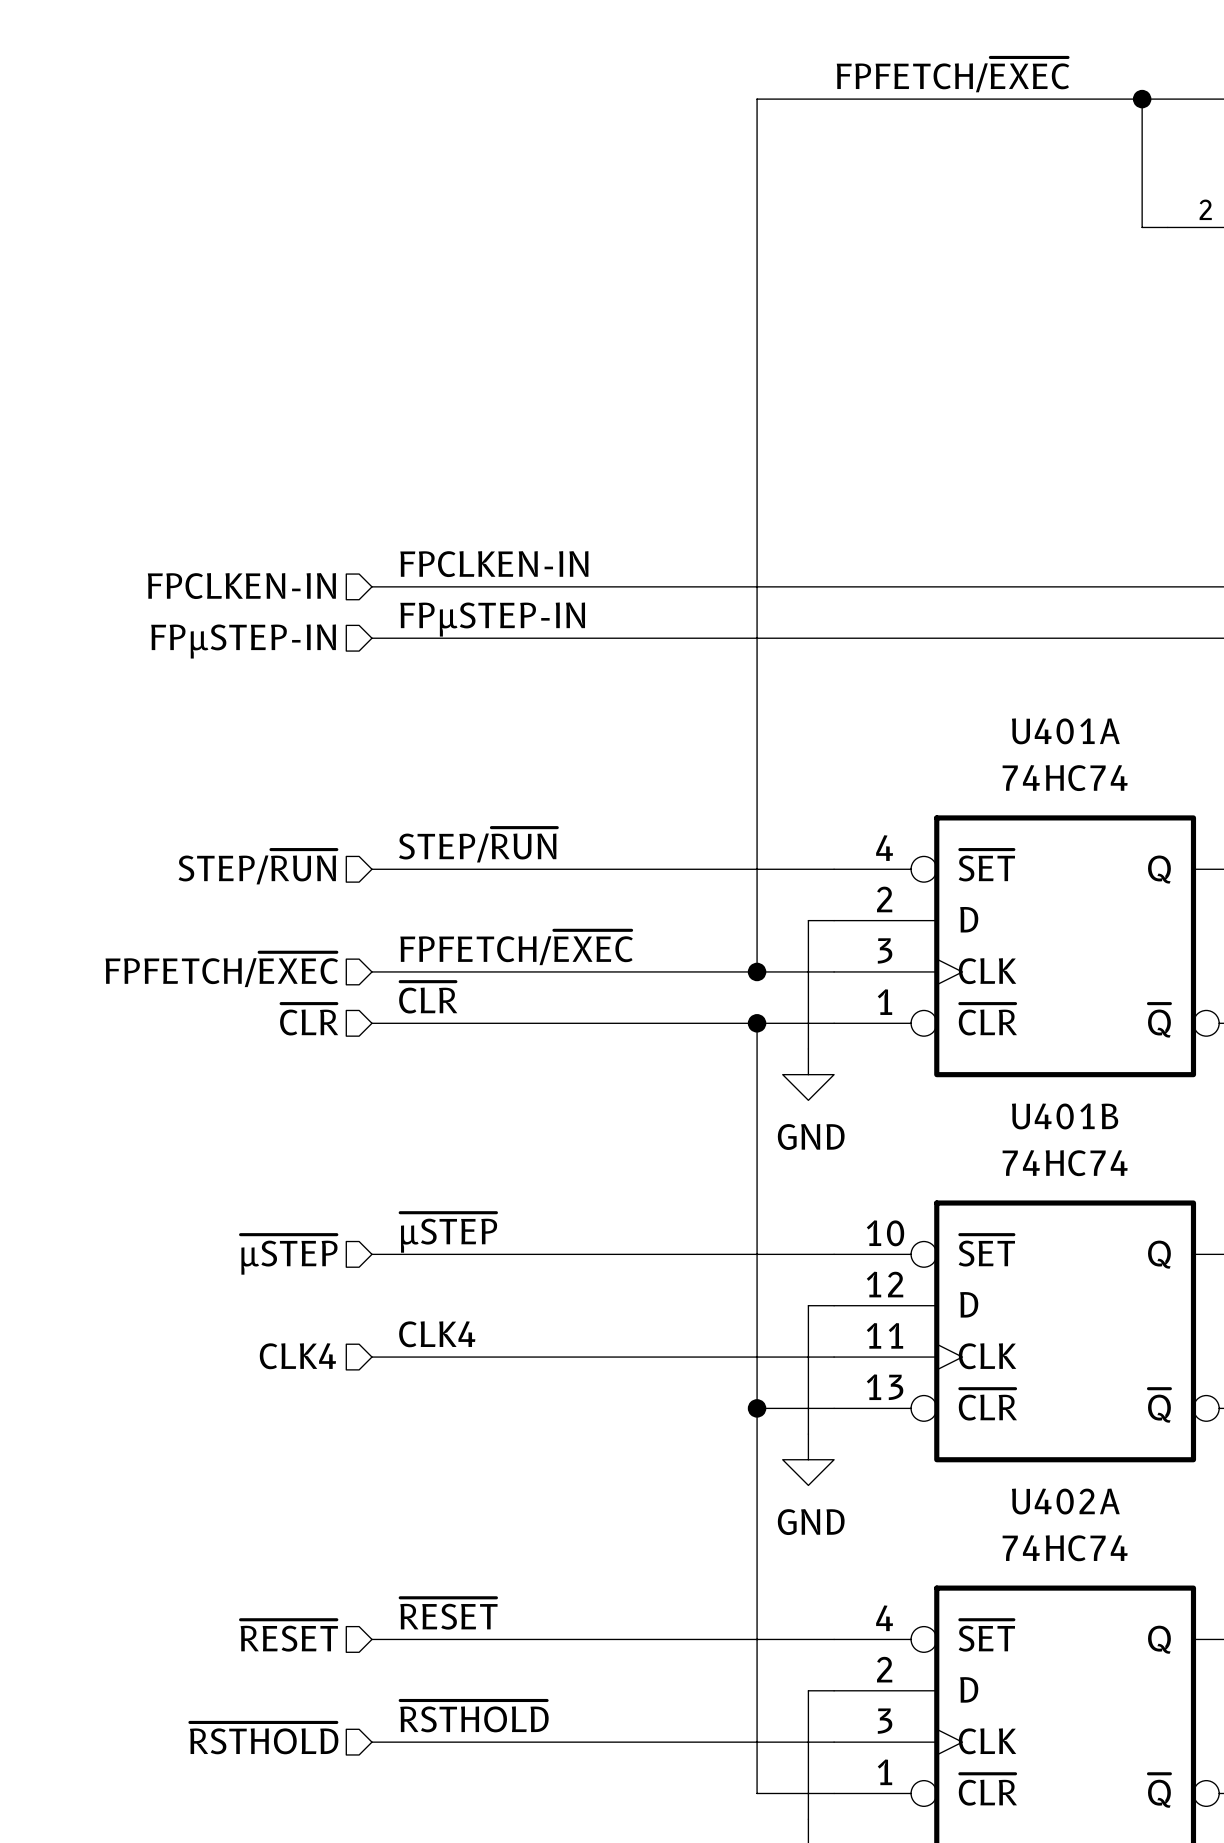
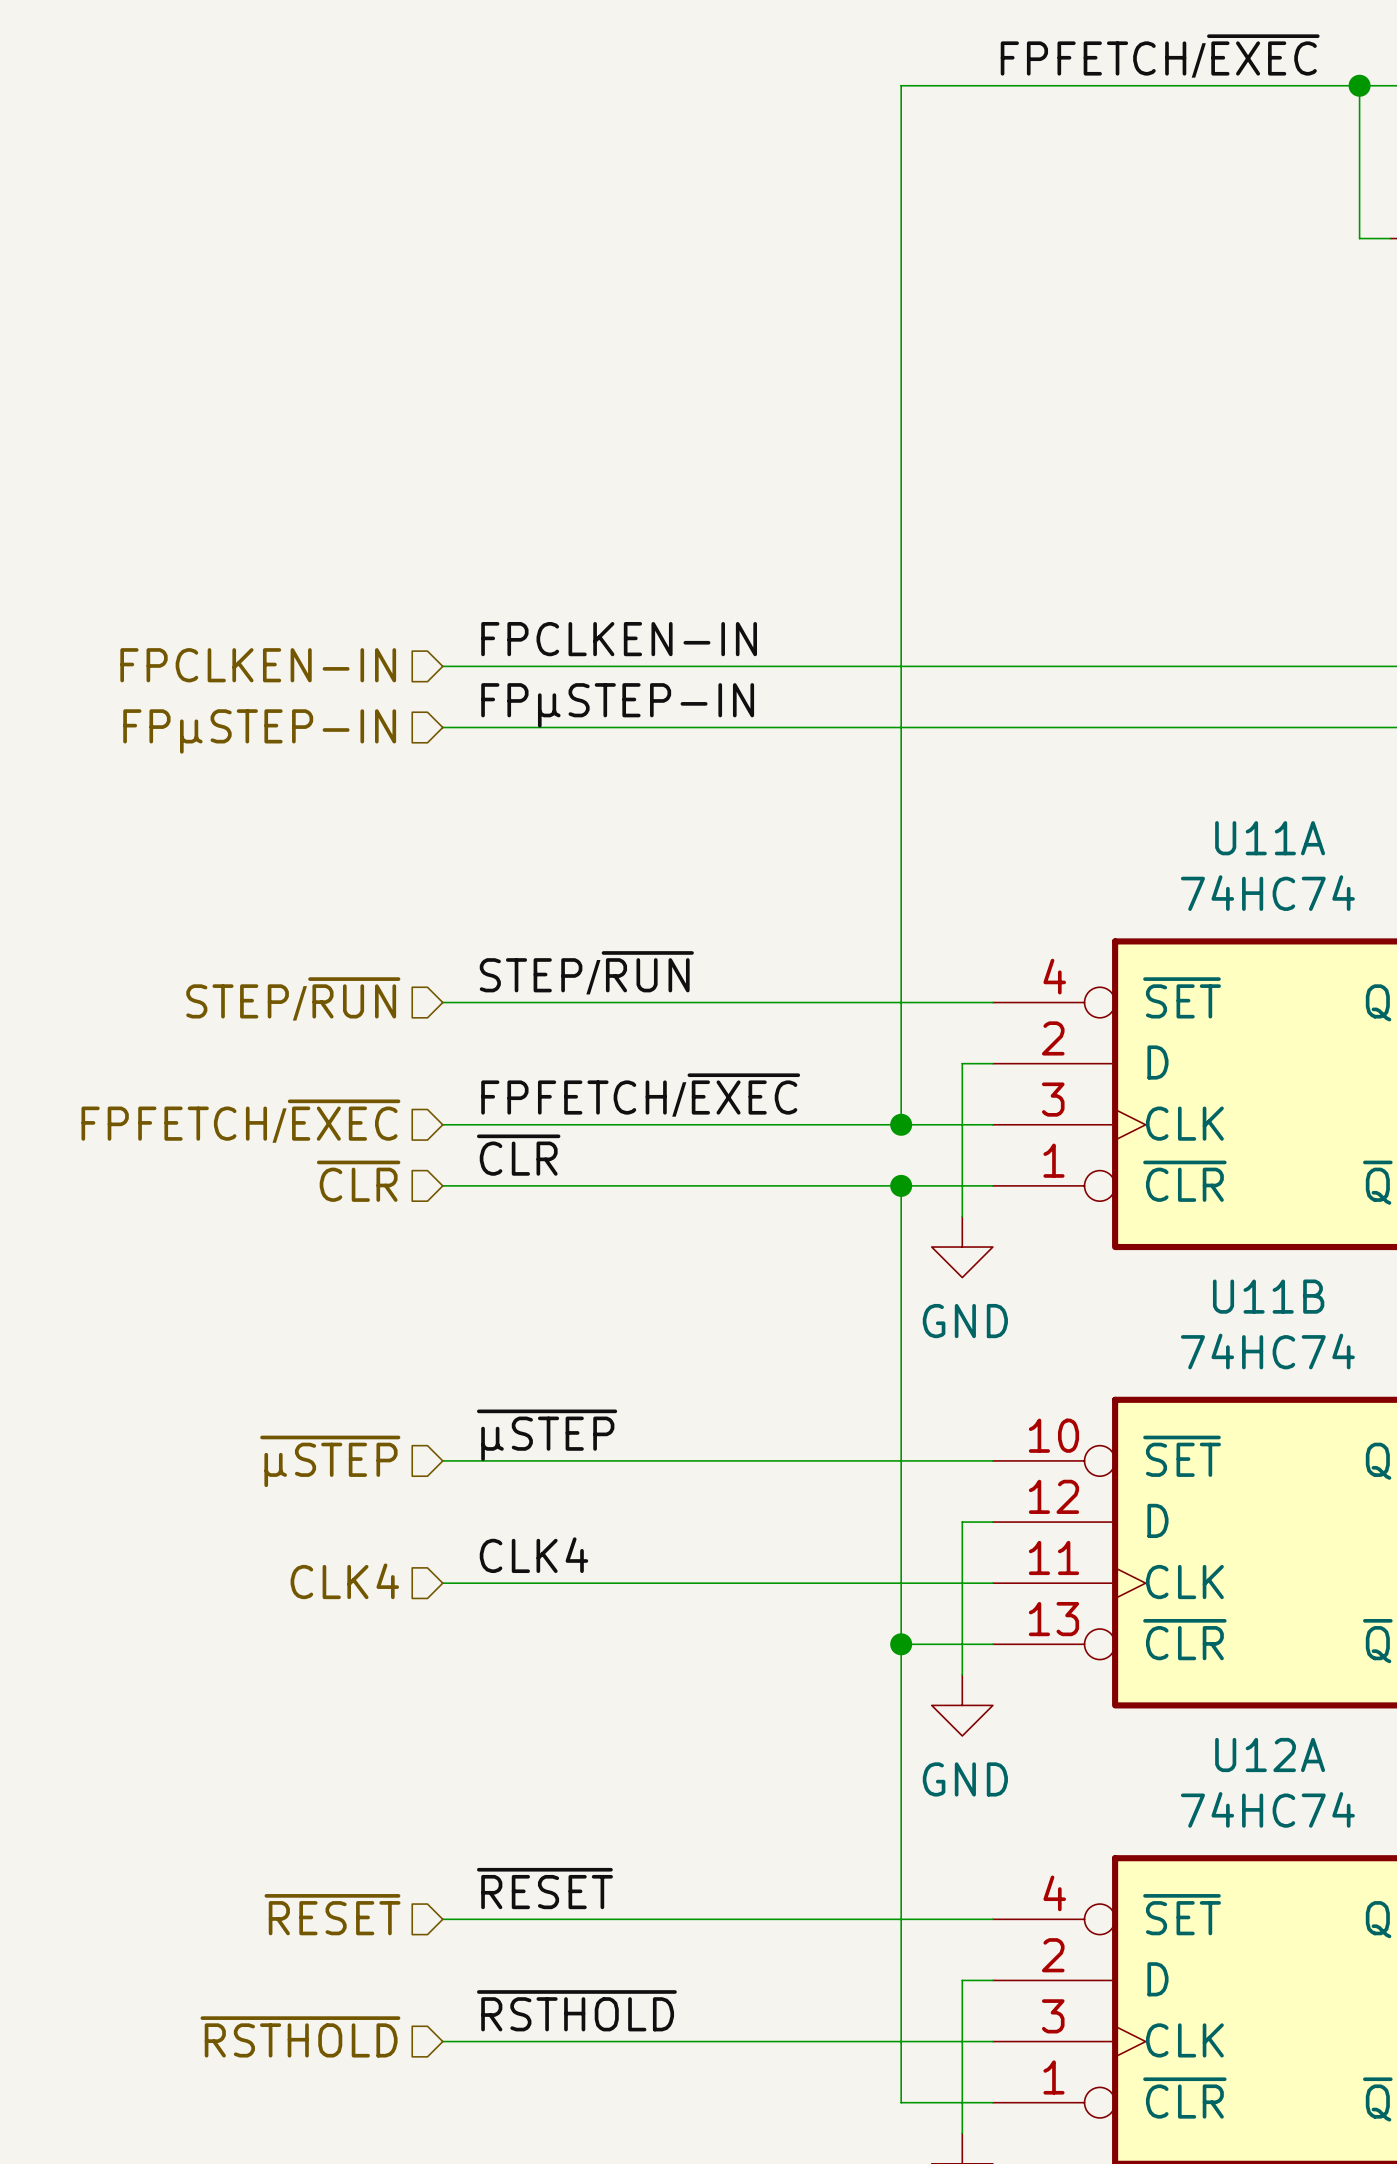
U401A name: U401A (1065, 731) -> U11A (1270, 838)
U401B name: U401B (1065, 1116) -> U11B (1268, 1296)
U402A name: U402A (1065, 1501) -> U12A (1270, 1755)

